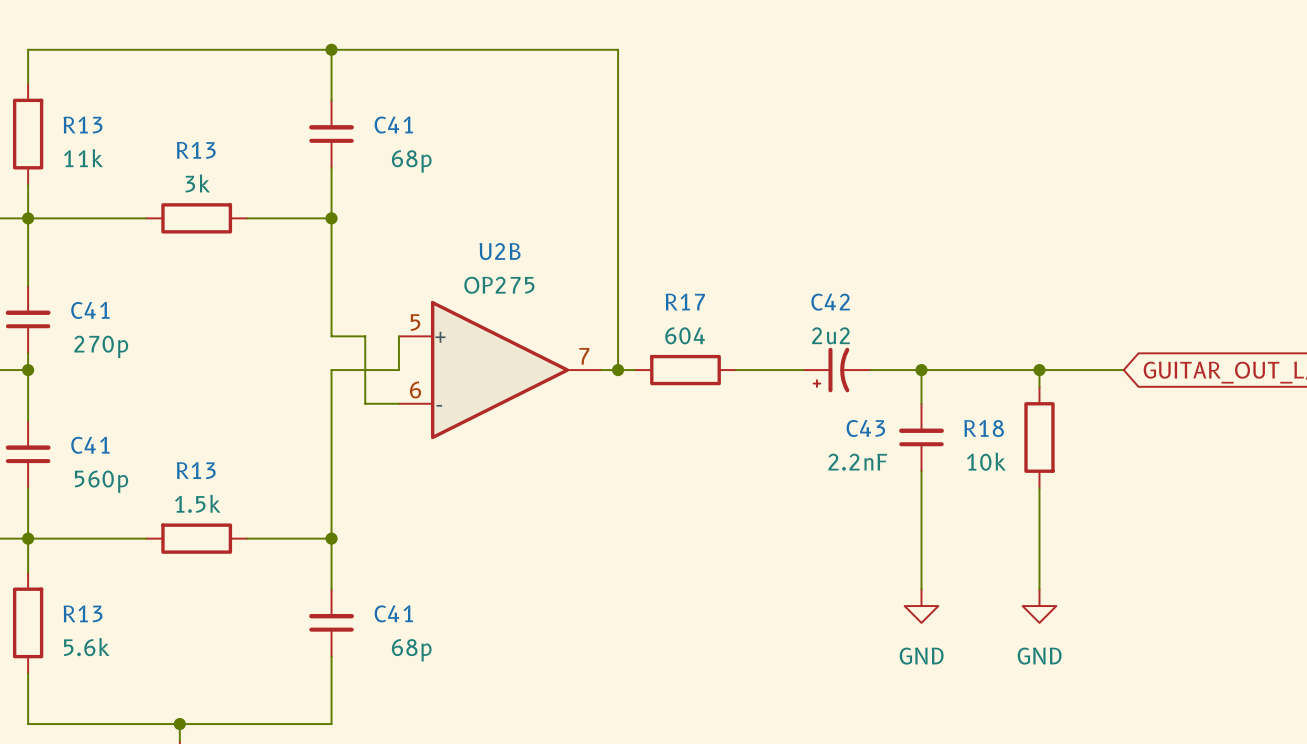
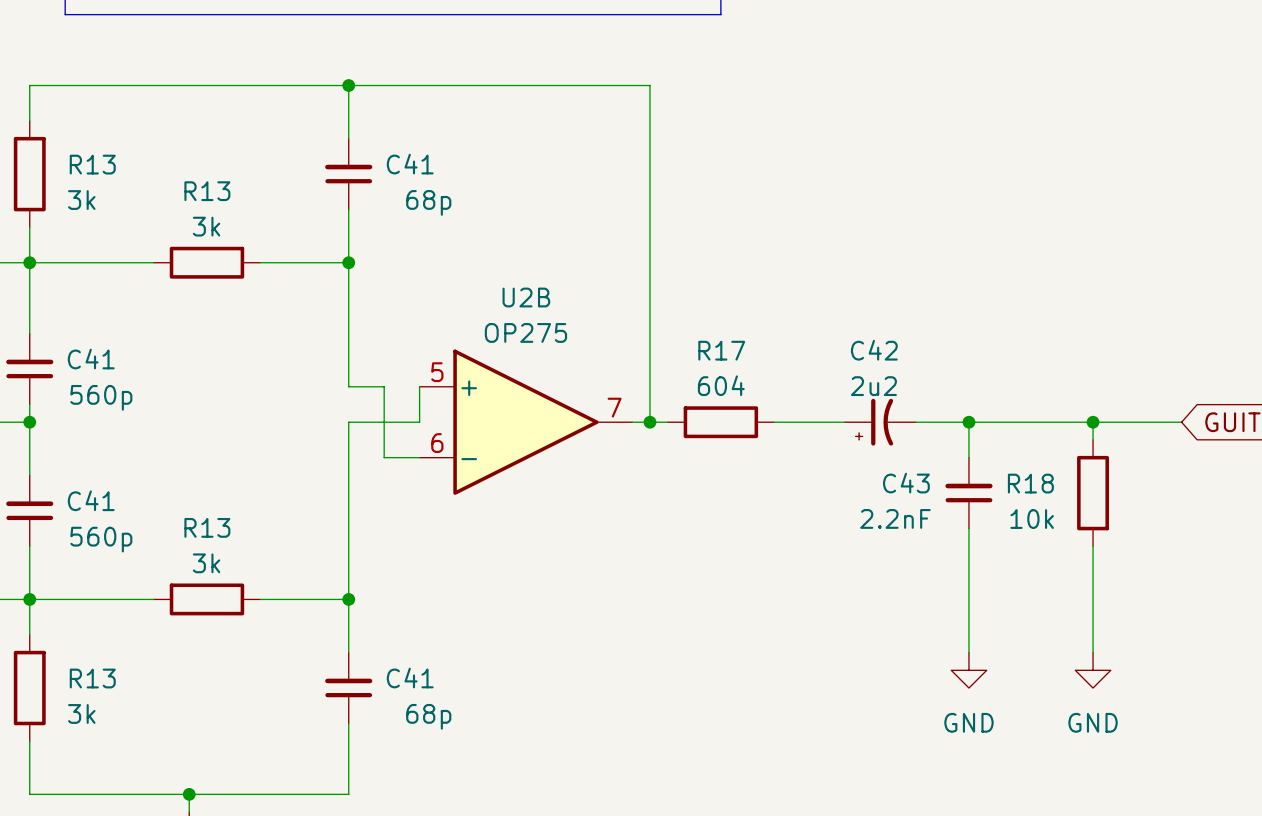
R13 value: 11k (83, 158) -> 3k (81, 200)
C41 value: 270p (101, 346) -> 560p (101, 397)
R13 value: 1.5k (197, 503) -> 3k (206, 563)
R13 value: 5.6k (86, 647) -> 3k (81, 713)

